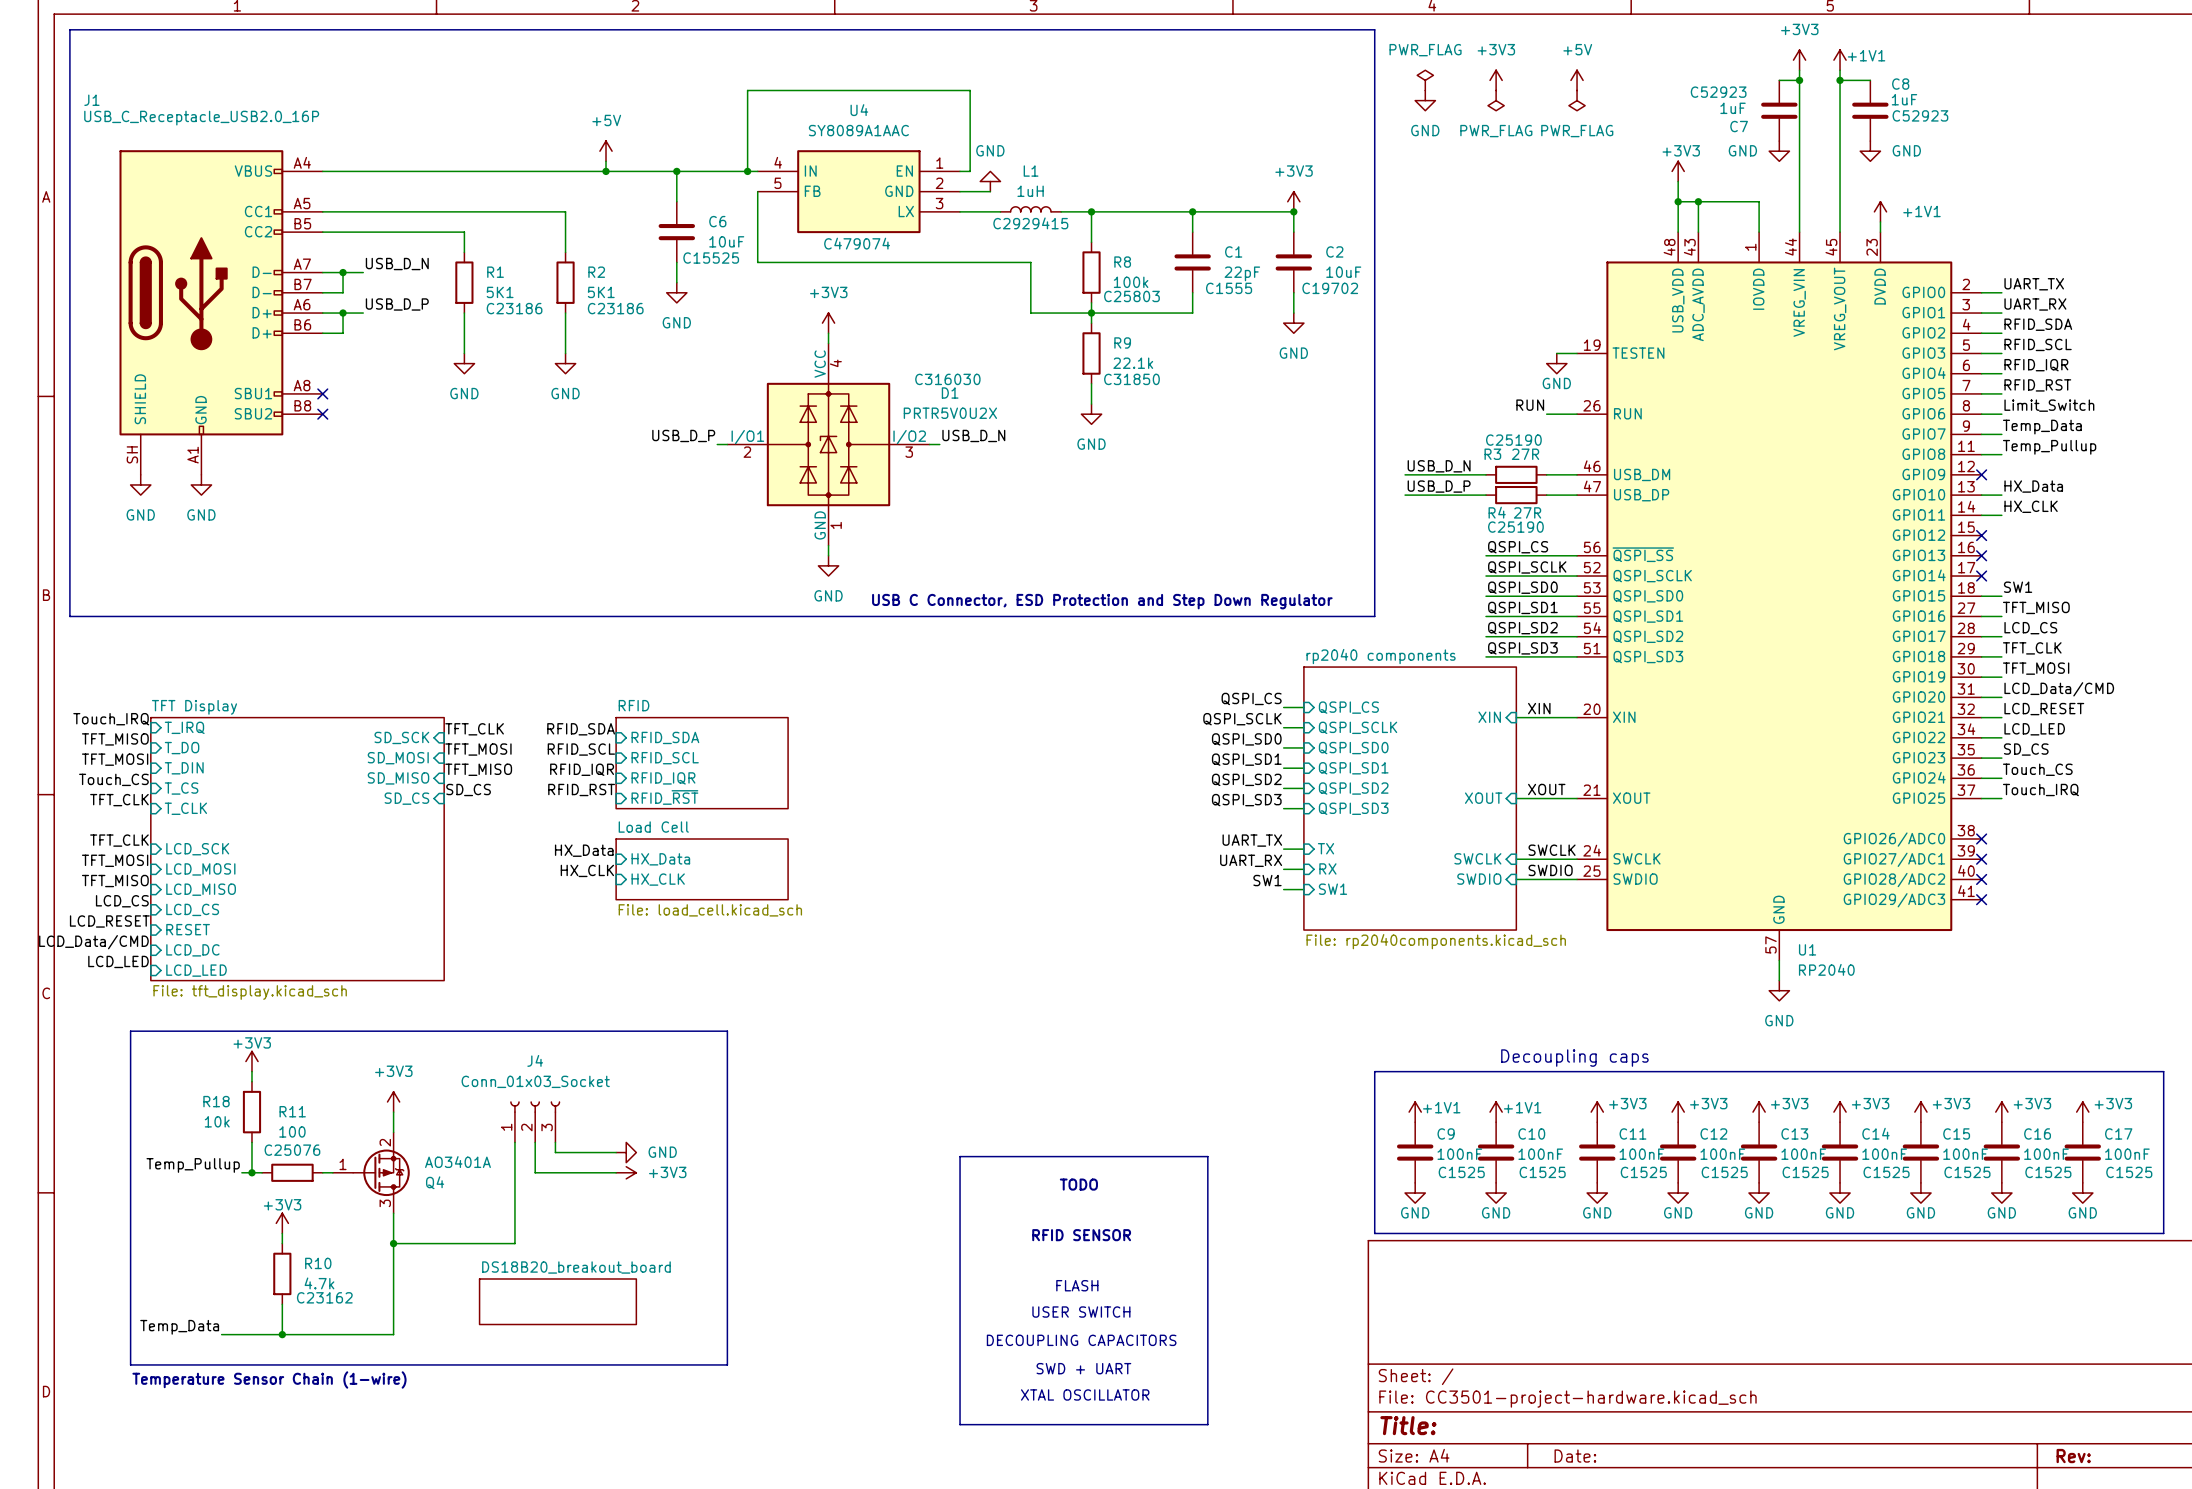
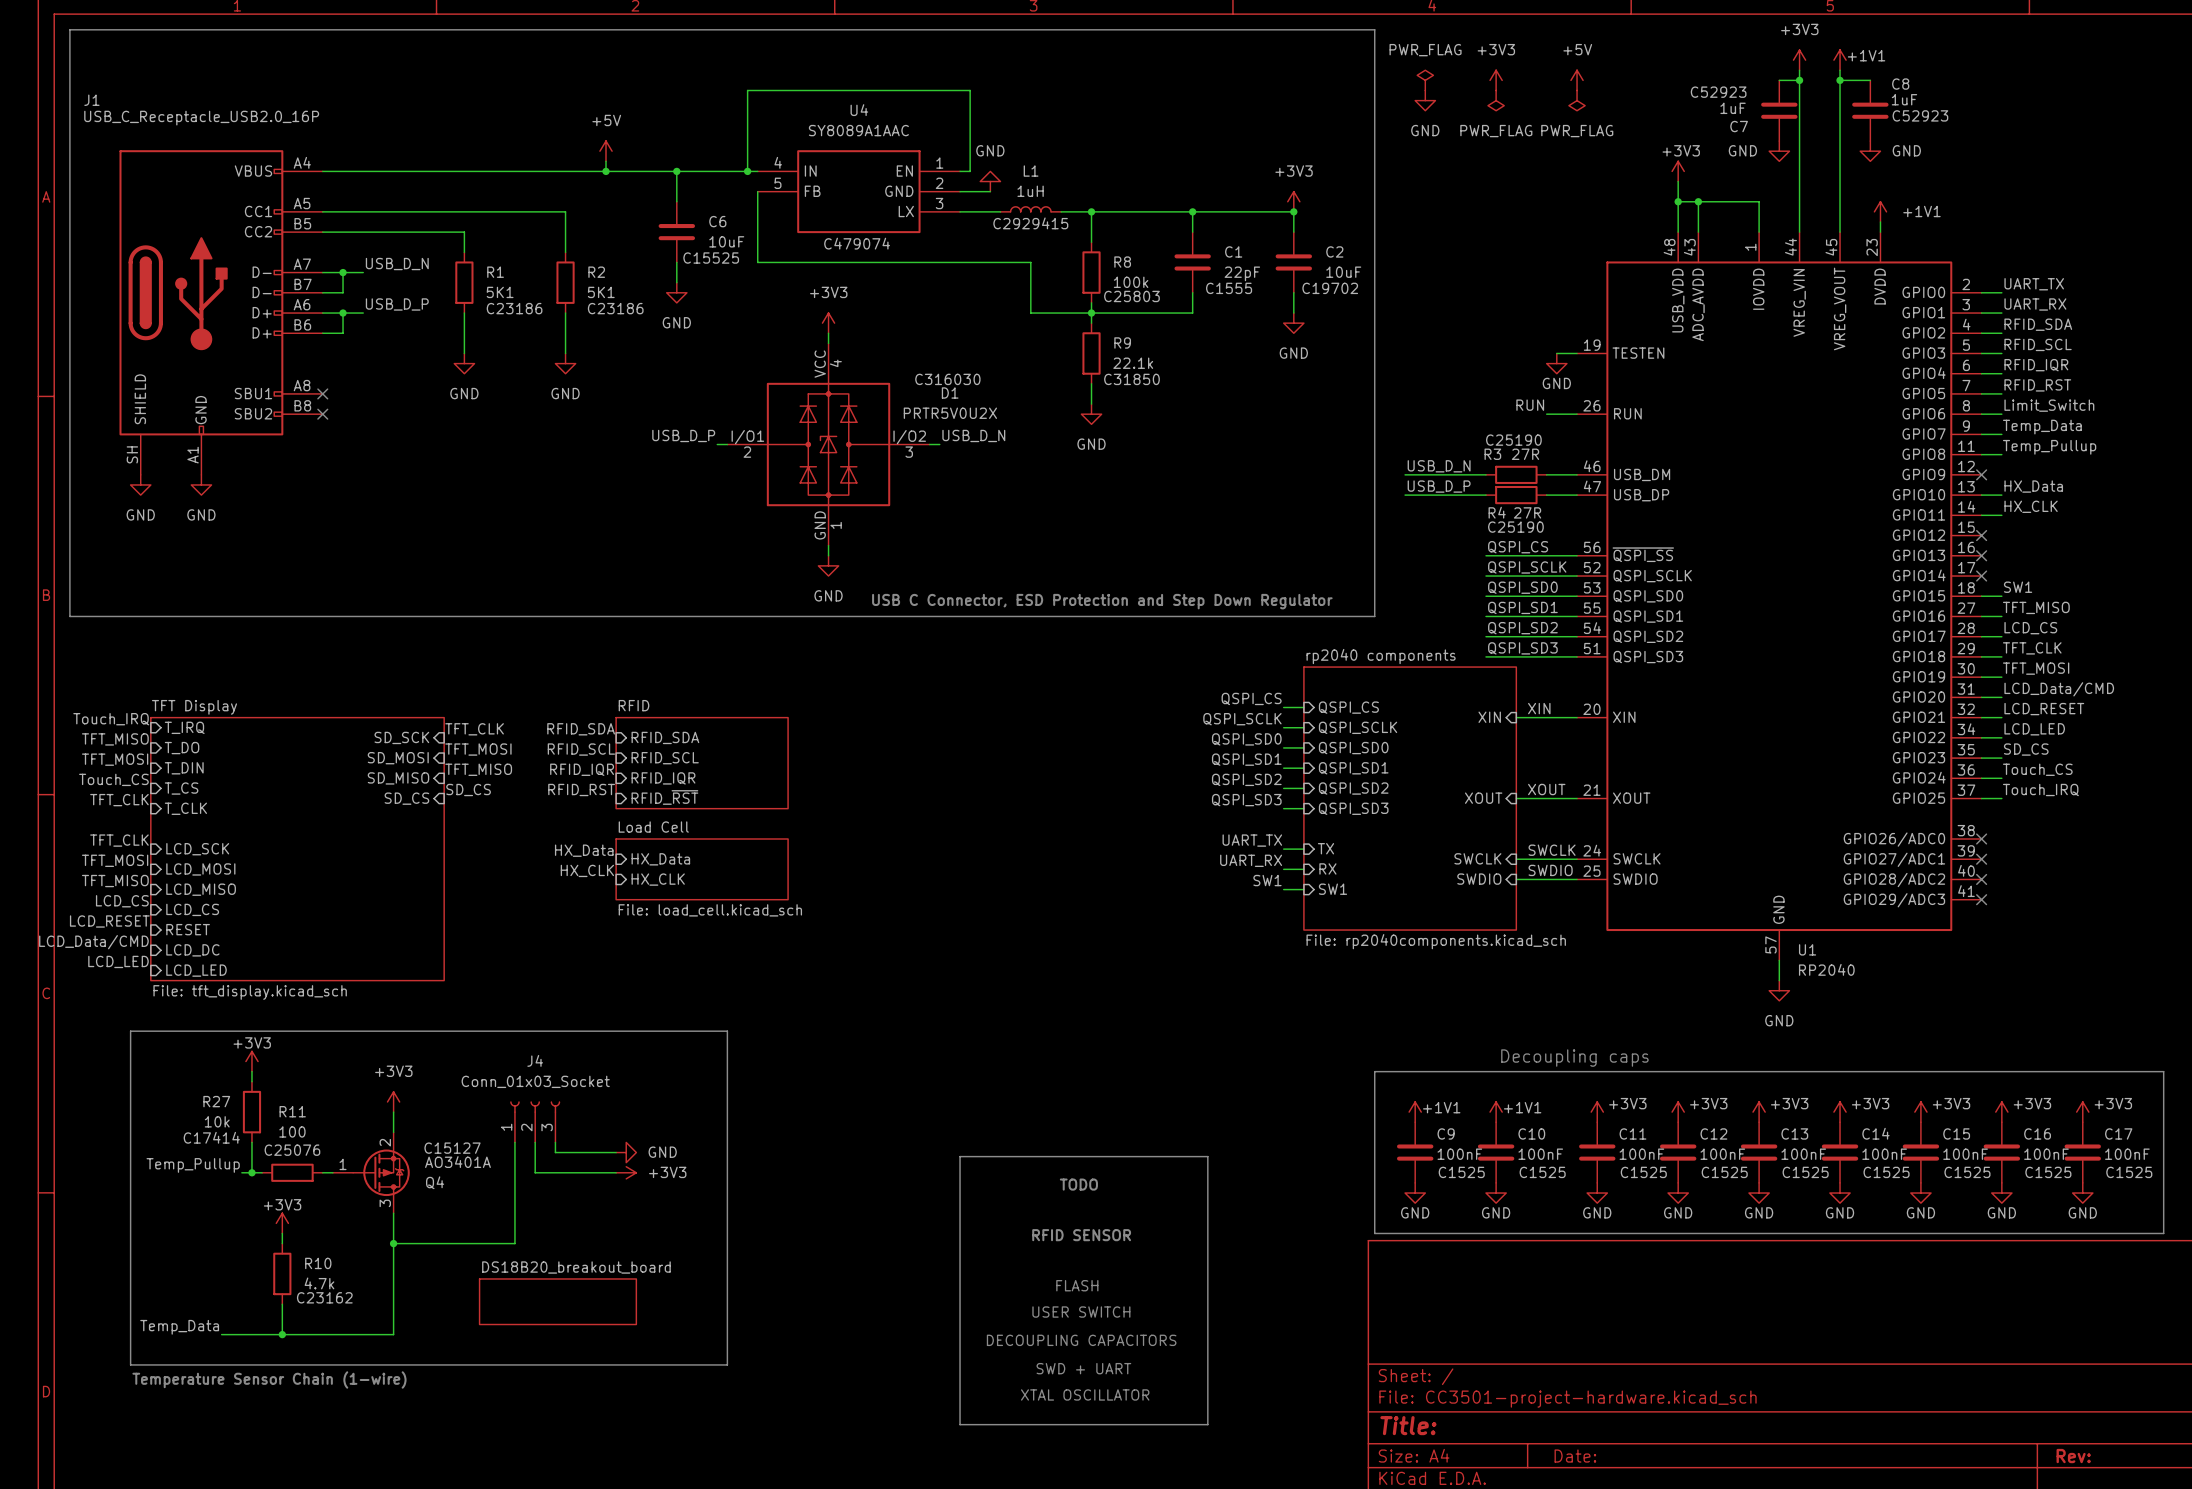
R18 name: R18 (216, 1101) -> R27 (216, 1101)
R18 text: none -> C17414 (211, 1137)
Q4 text: none -> C15127 (452, 1148)

